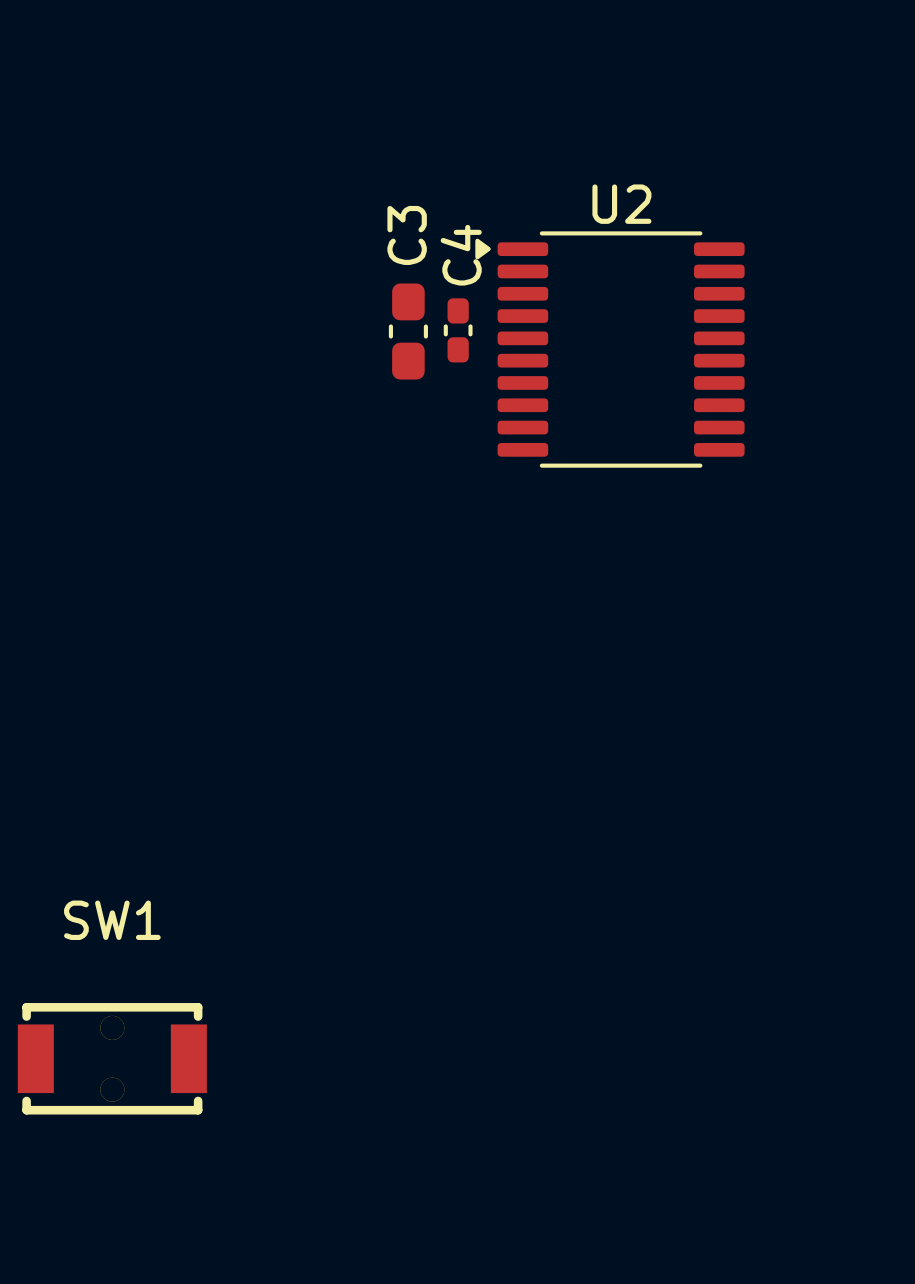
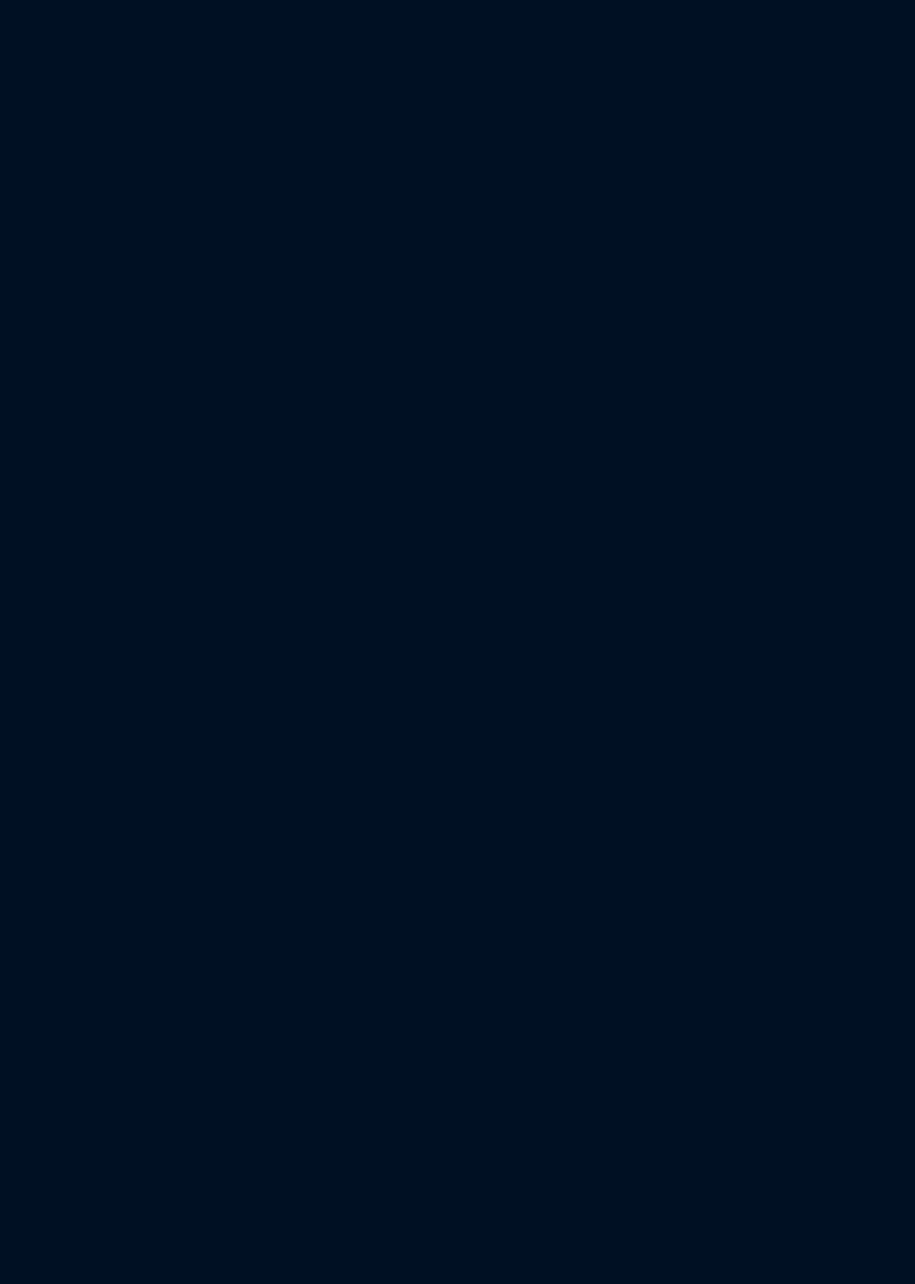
C4: (458, 330) -> none
C3: (408, 331) -> none
U2: (609, 349) -> none
SW1: (112, 1058) -> none

